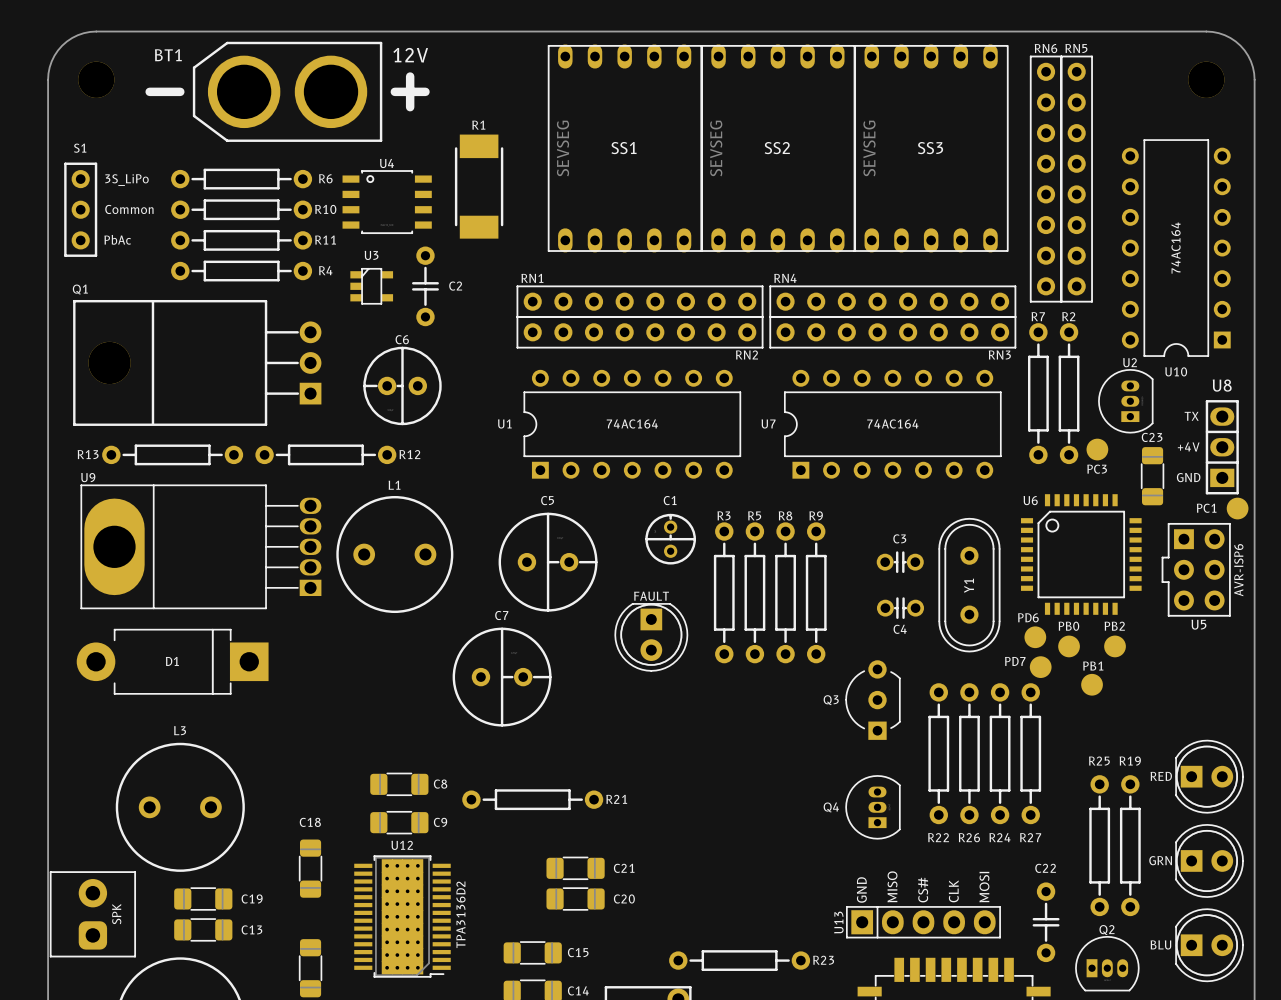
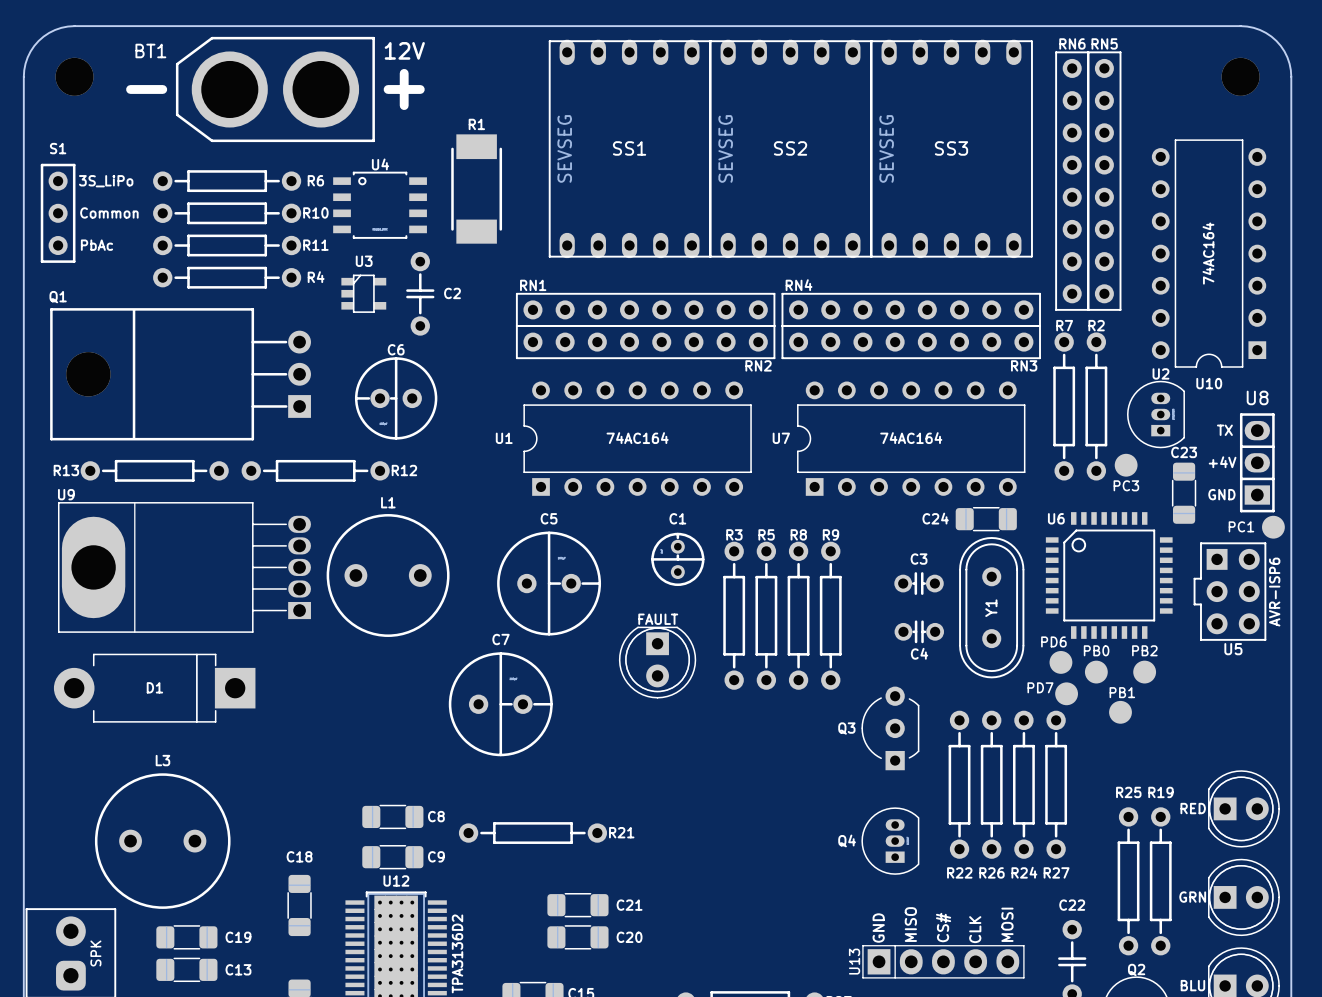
C24: none -> (986, 519)

